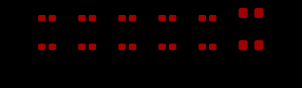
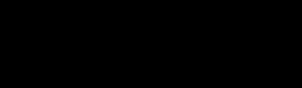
part: (251, 12) -> none
part: (47, 18) -> none
part: (87, 18) -> none
part: (127, 18) -> none
part: (167, 18) -> none
part: (207, 18) -> none
part: (251, 45) -> none
part: (47, 46) -> none
part: (87, 46) -> none
part: (127, 46) -> none
part: (167, 46) -> none
part: (207, 46) -> none

